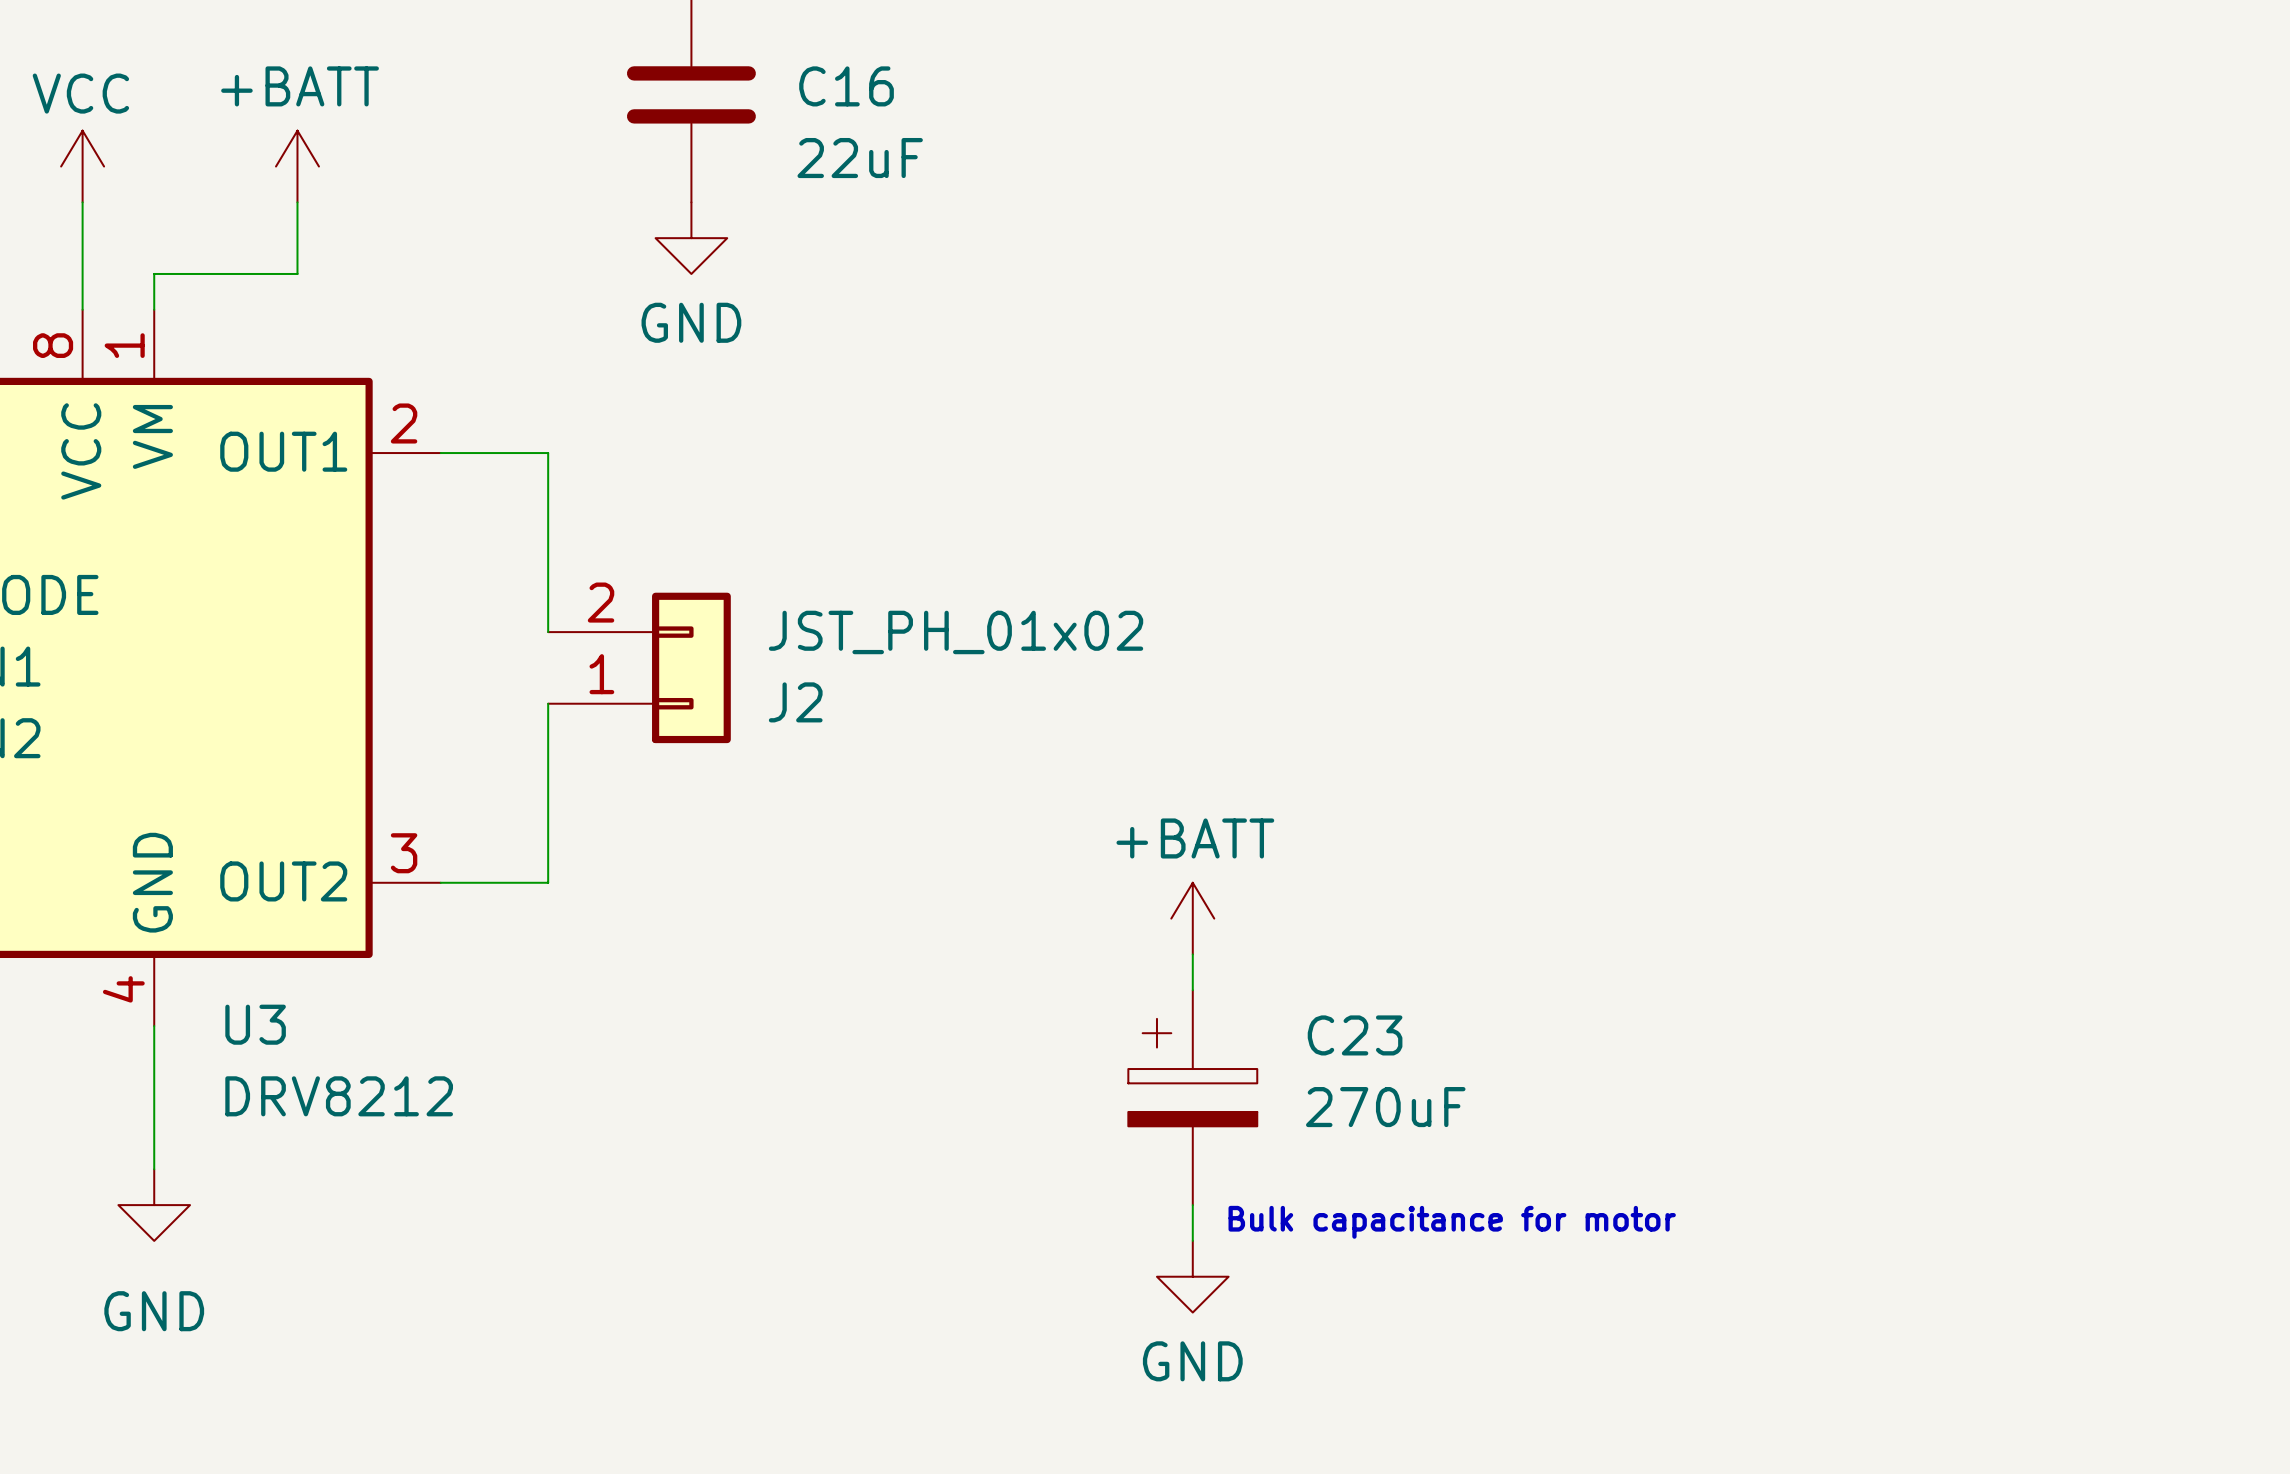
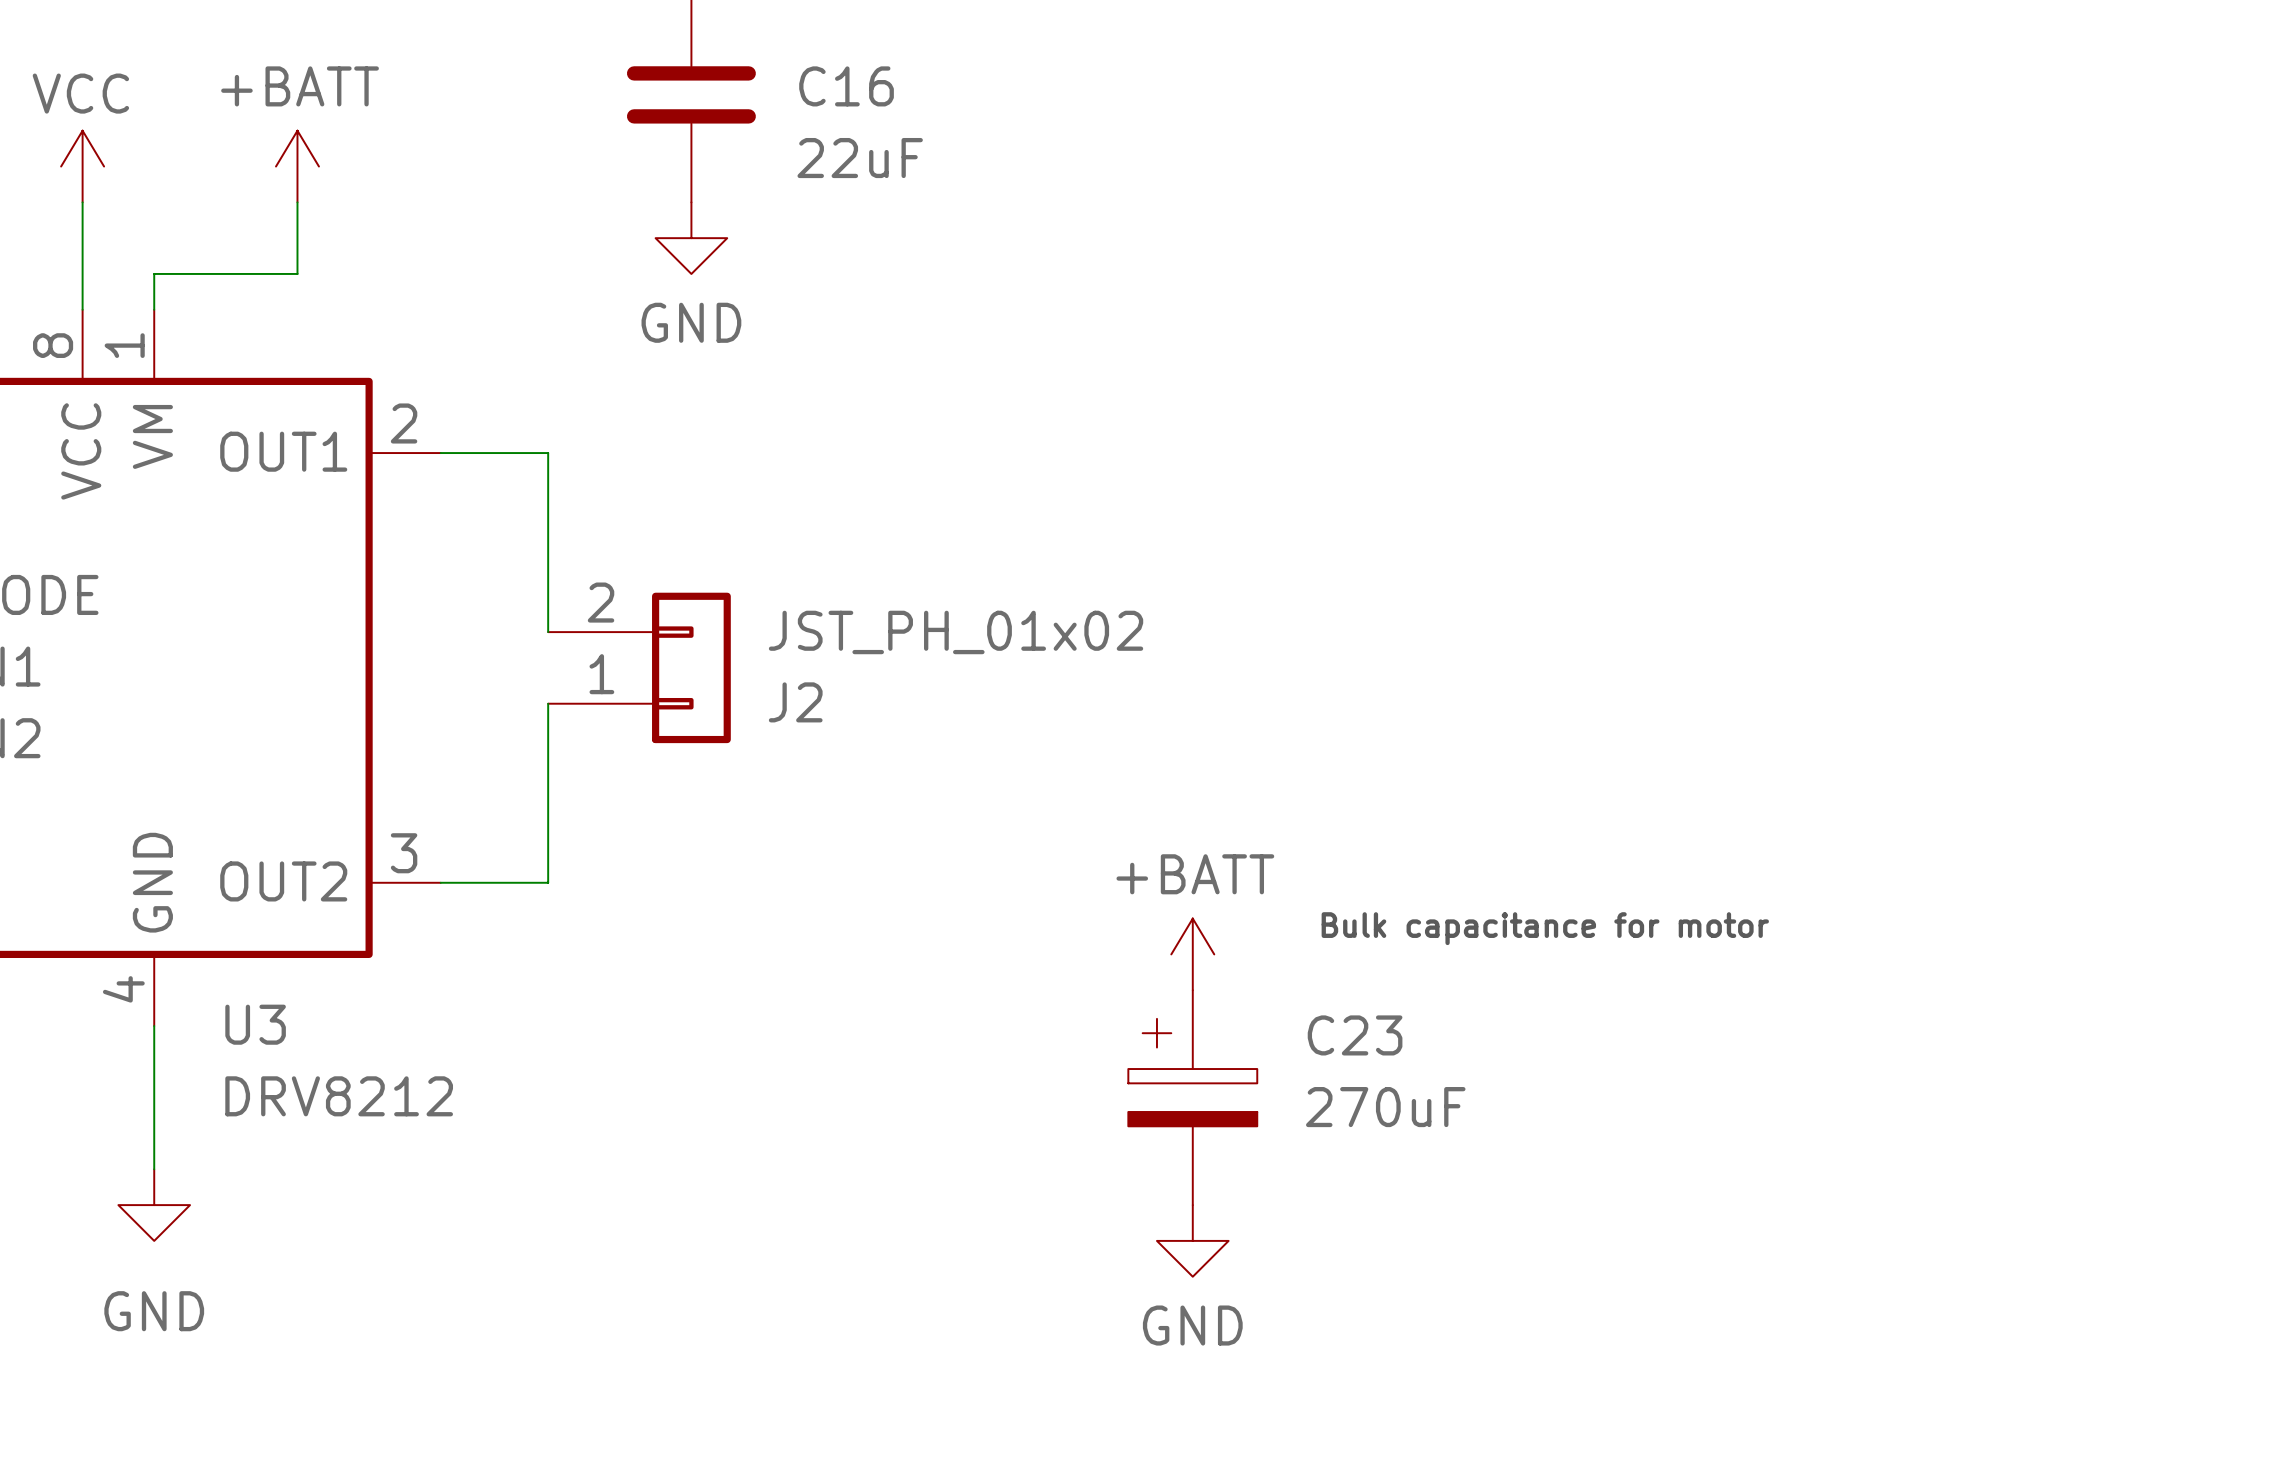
power symbol position: +BATT (1192, 918) -> +BATT (1192, 954)
text position: Bulk capacitance for motor (1452, 1222) -> Bulk capacitance for motor (1545, 928)
power symbol position: GND (1192, 1276) -> GND (1192, 1240)

